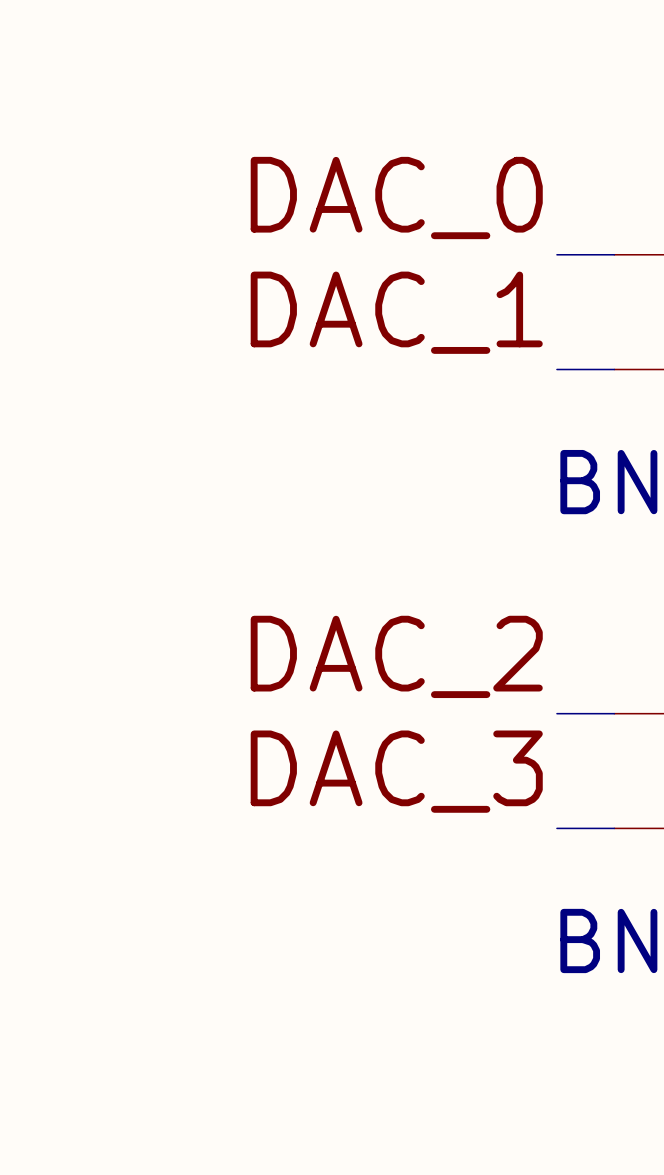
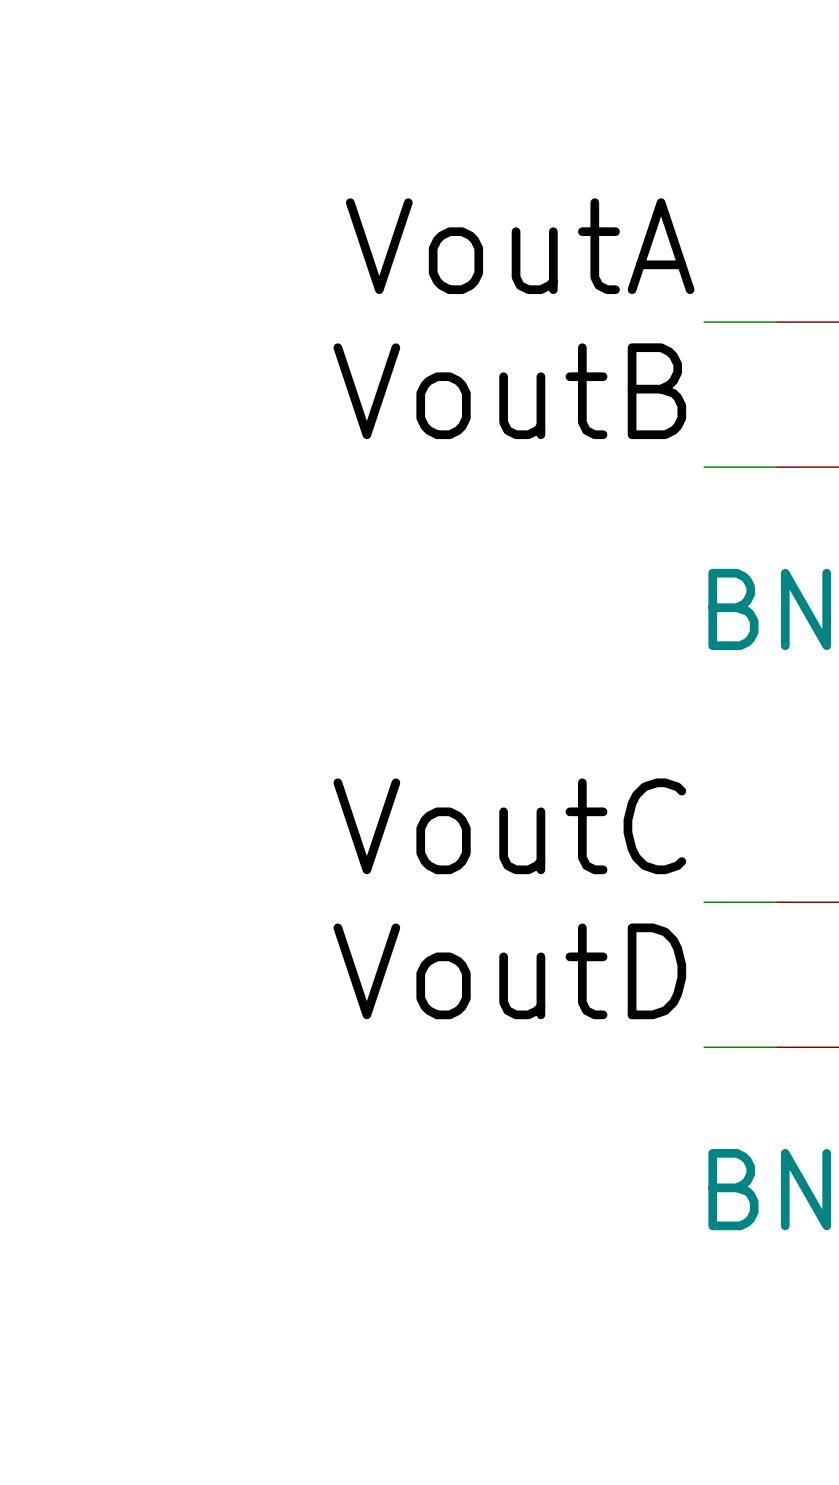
label: DAC_0 (396, 198) -> VoutA (520, 246)
label: DAC_1 (396, 312) -> VoutB (509, 391)
label: DAC_2 (396, 656) -> VoutC (509, 826)
label: DAC_3 (396, 771) -> VoutD (509, 971)

